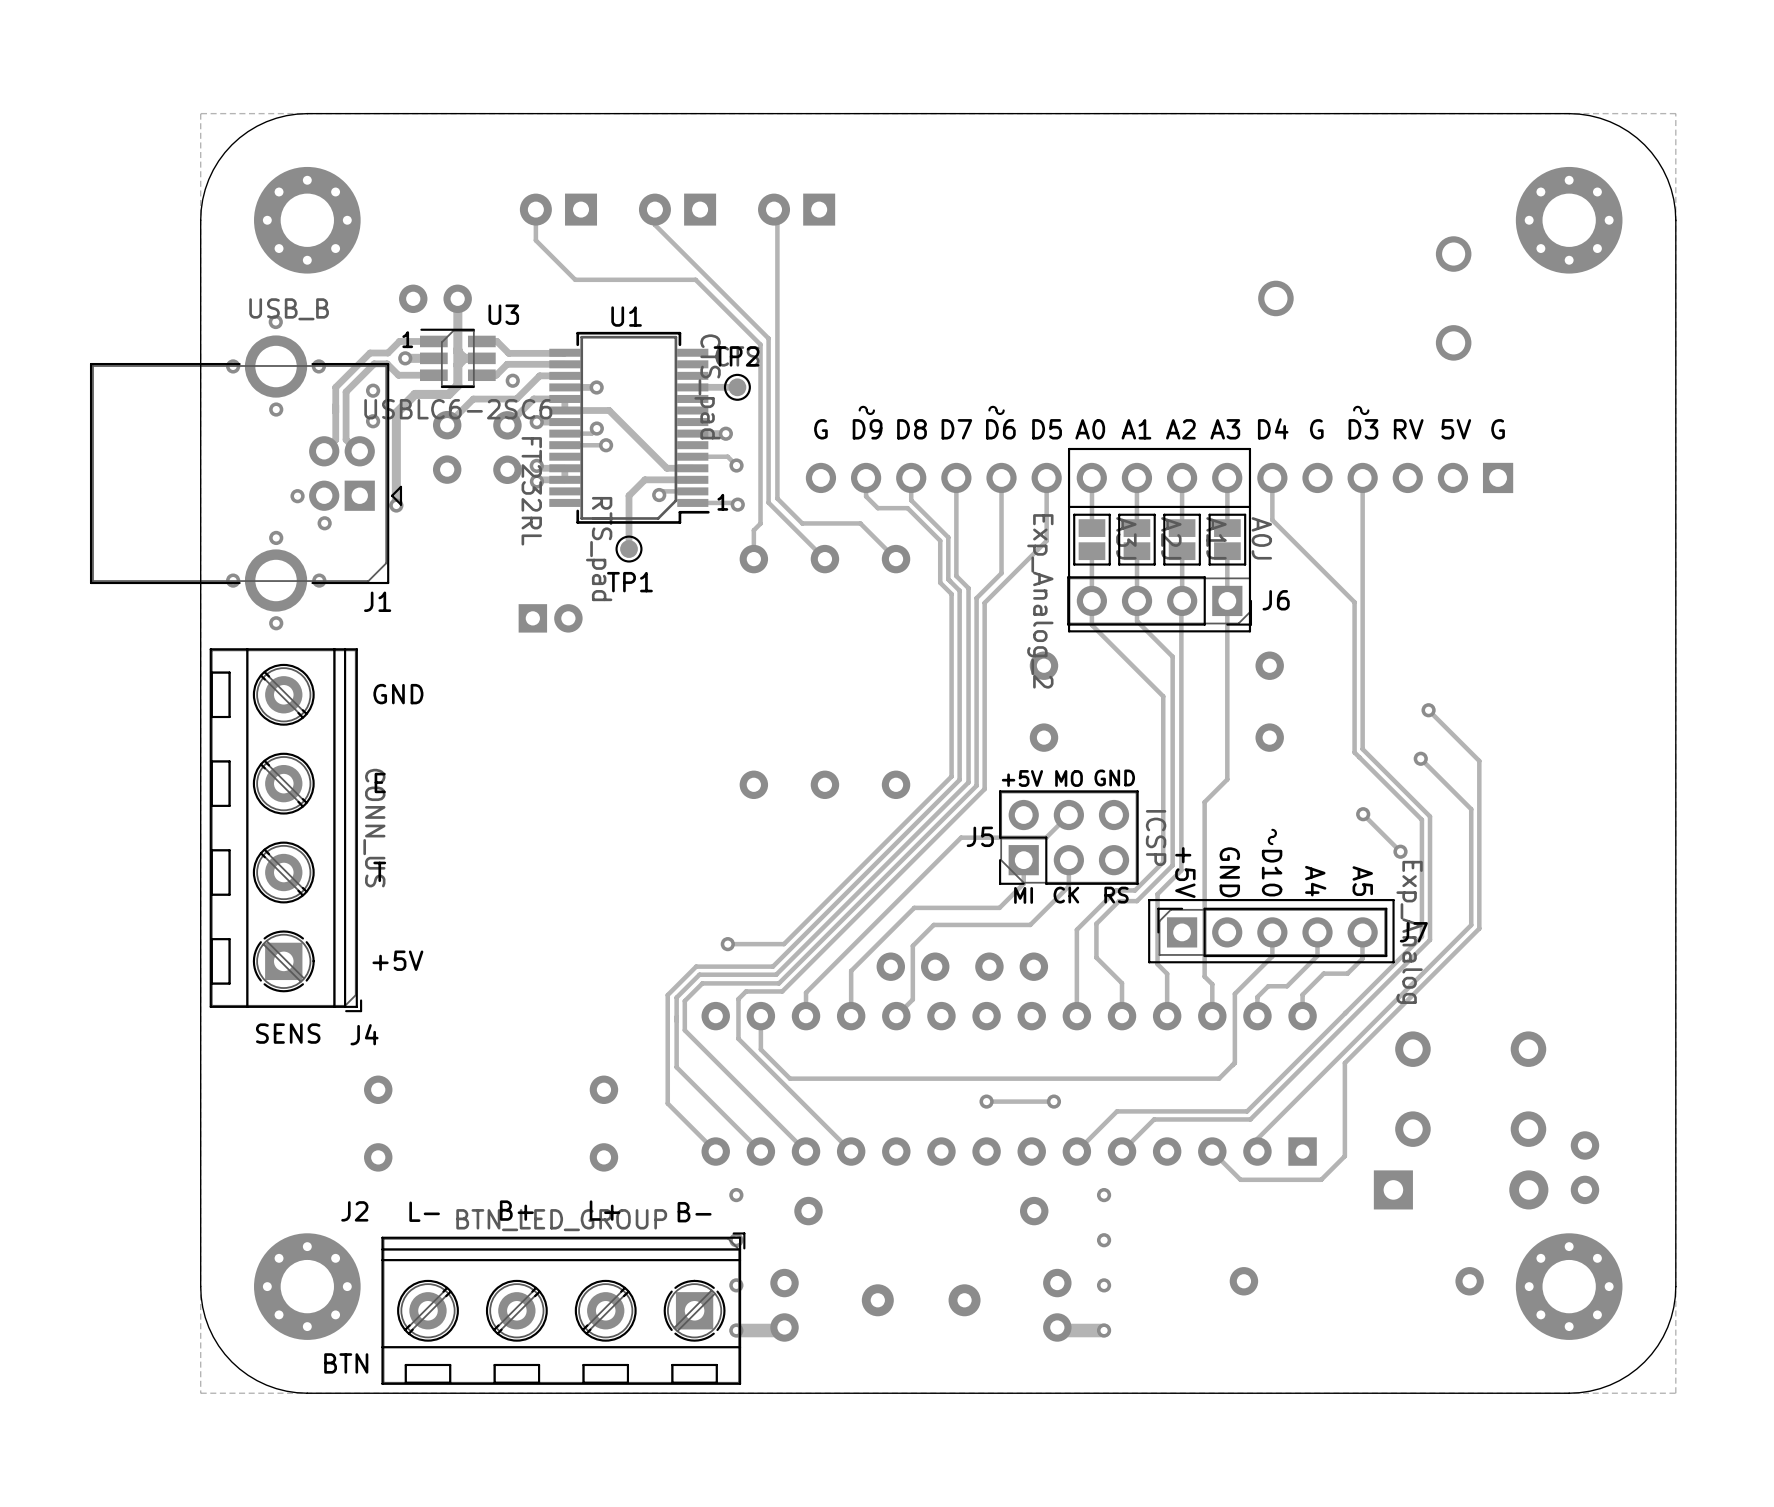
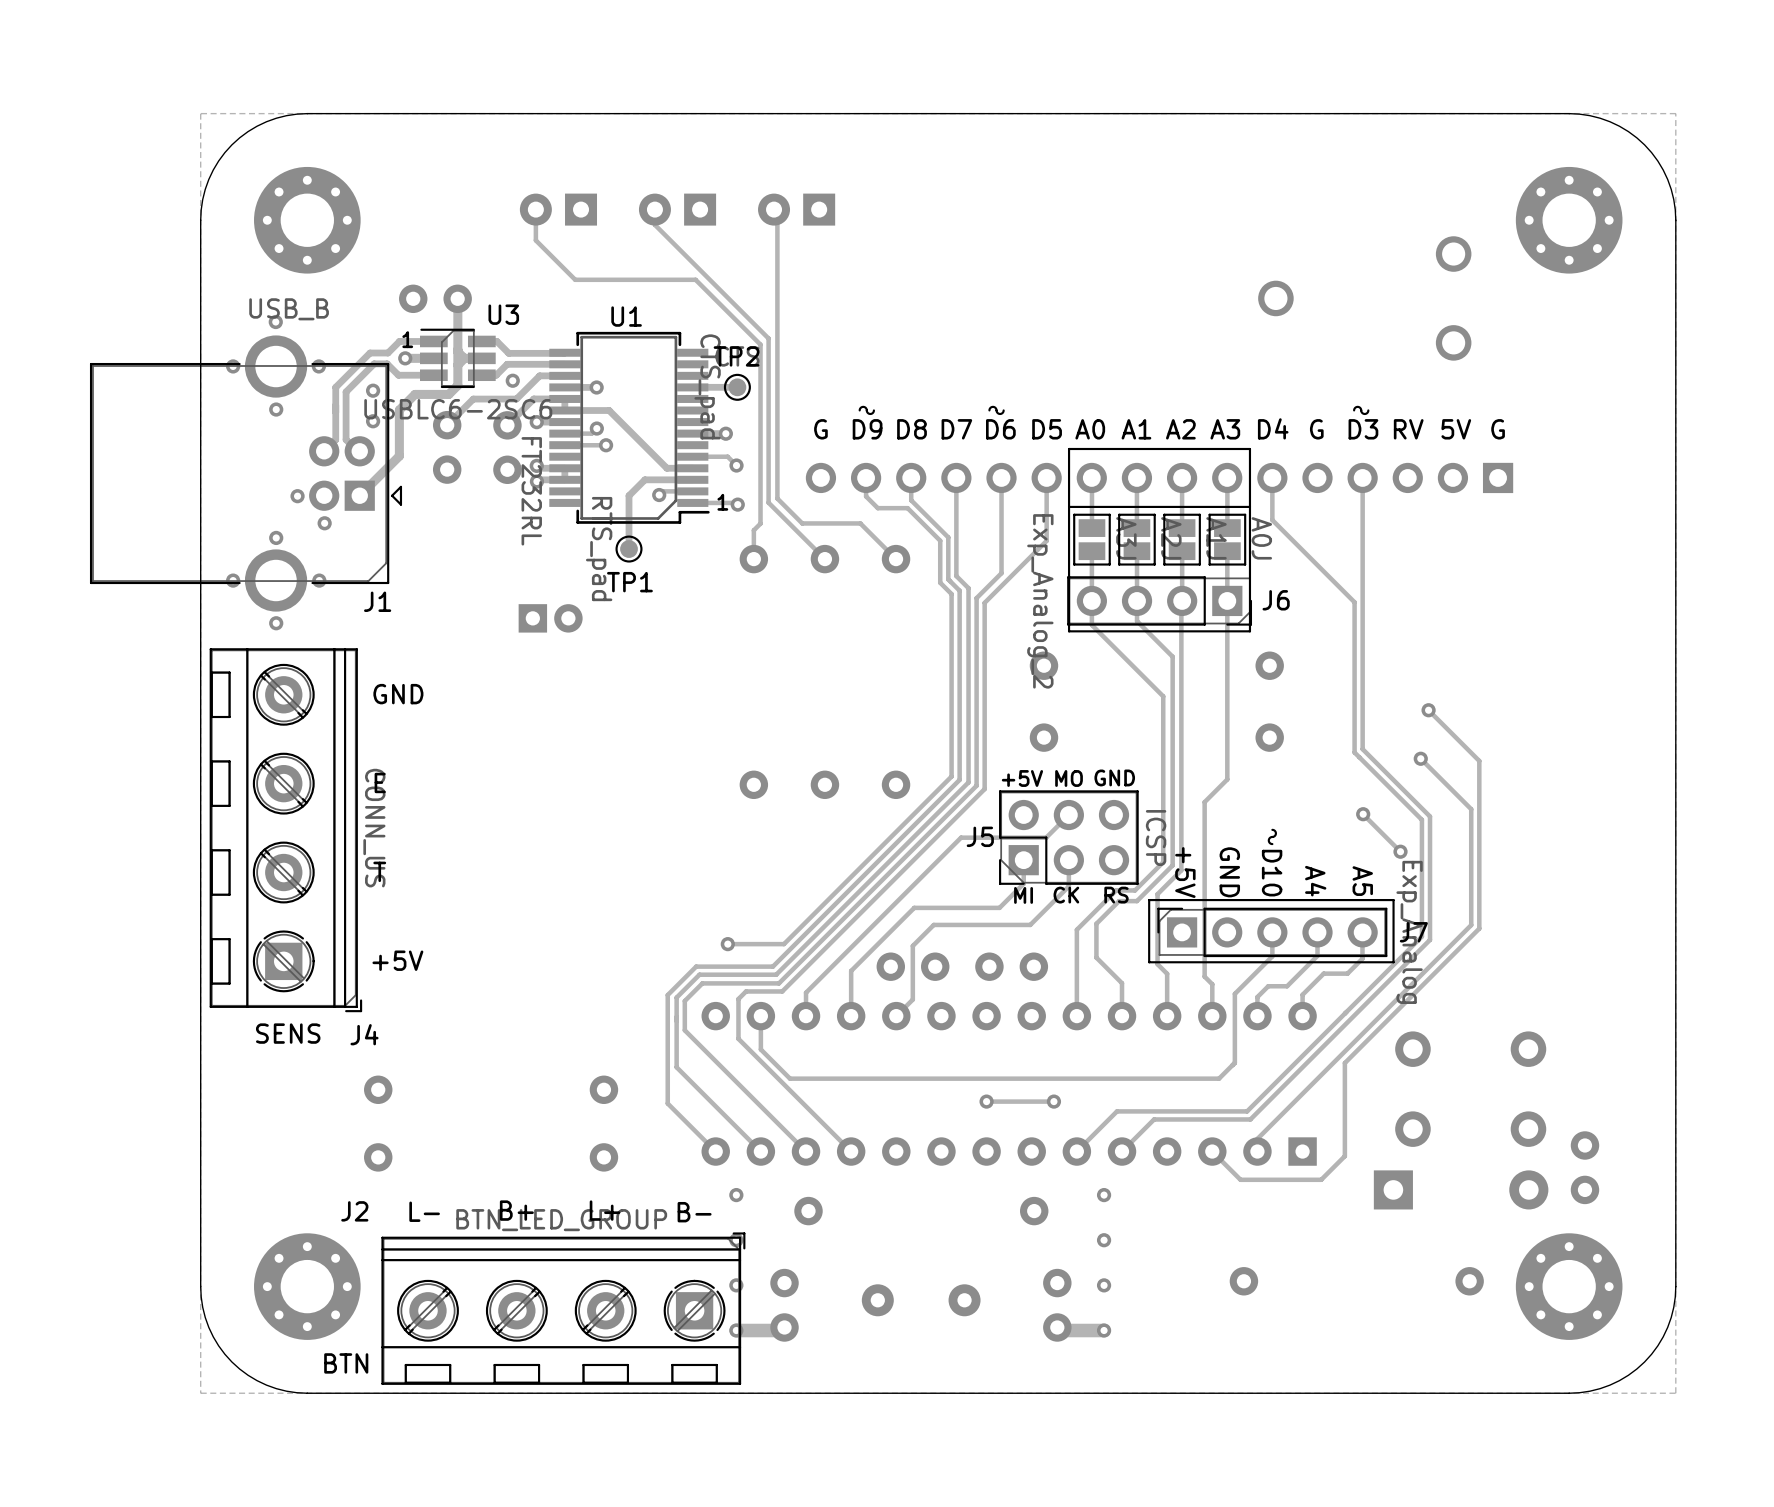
track: (399, 410) (396, 413) (396, 505) -> (399, 410) (399, 456) (359, 495)
via: (396, 505) -> none

